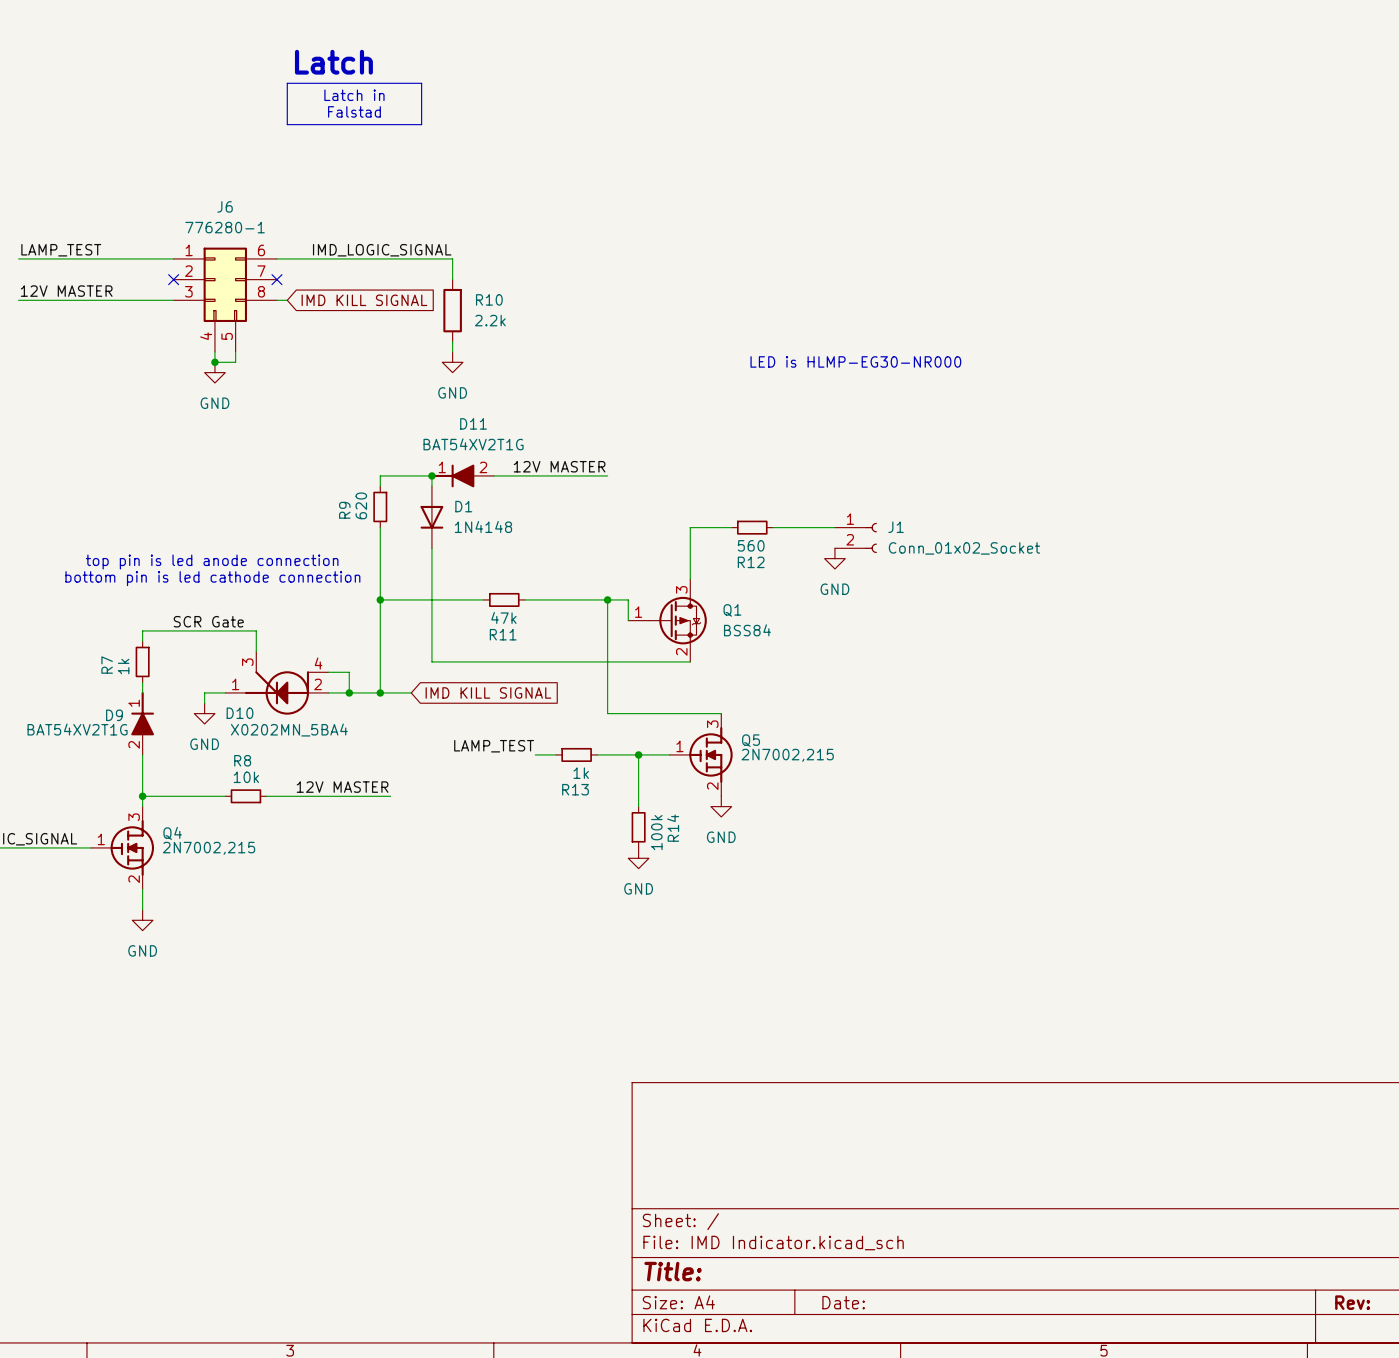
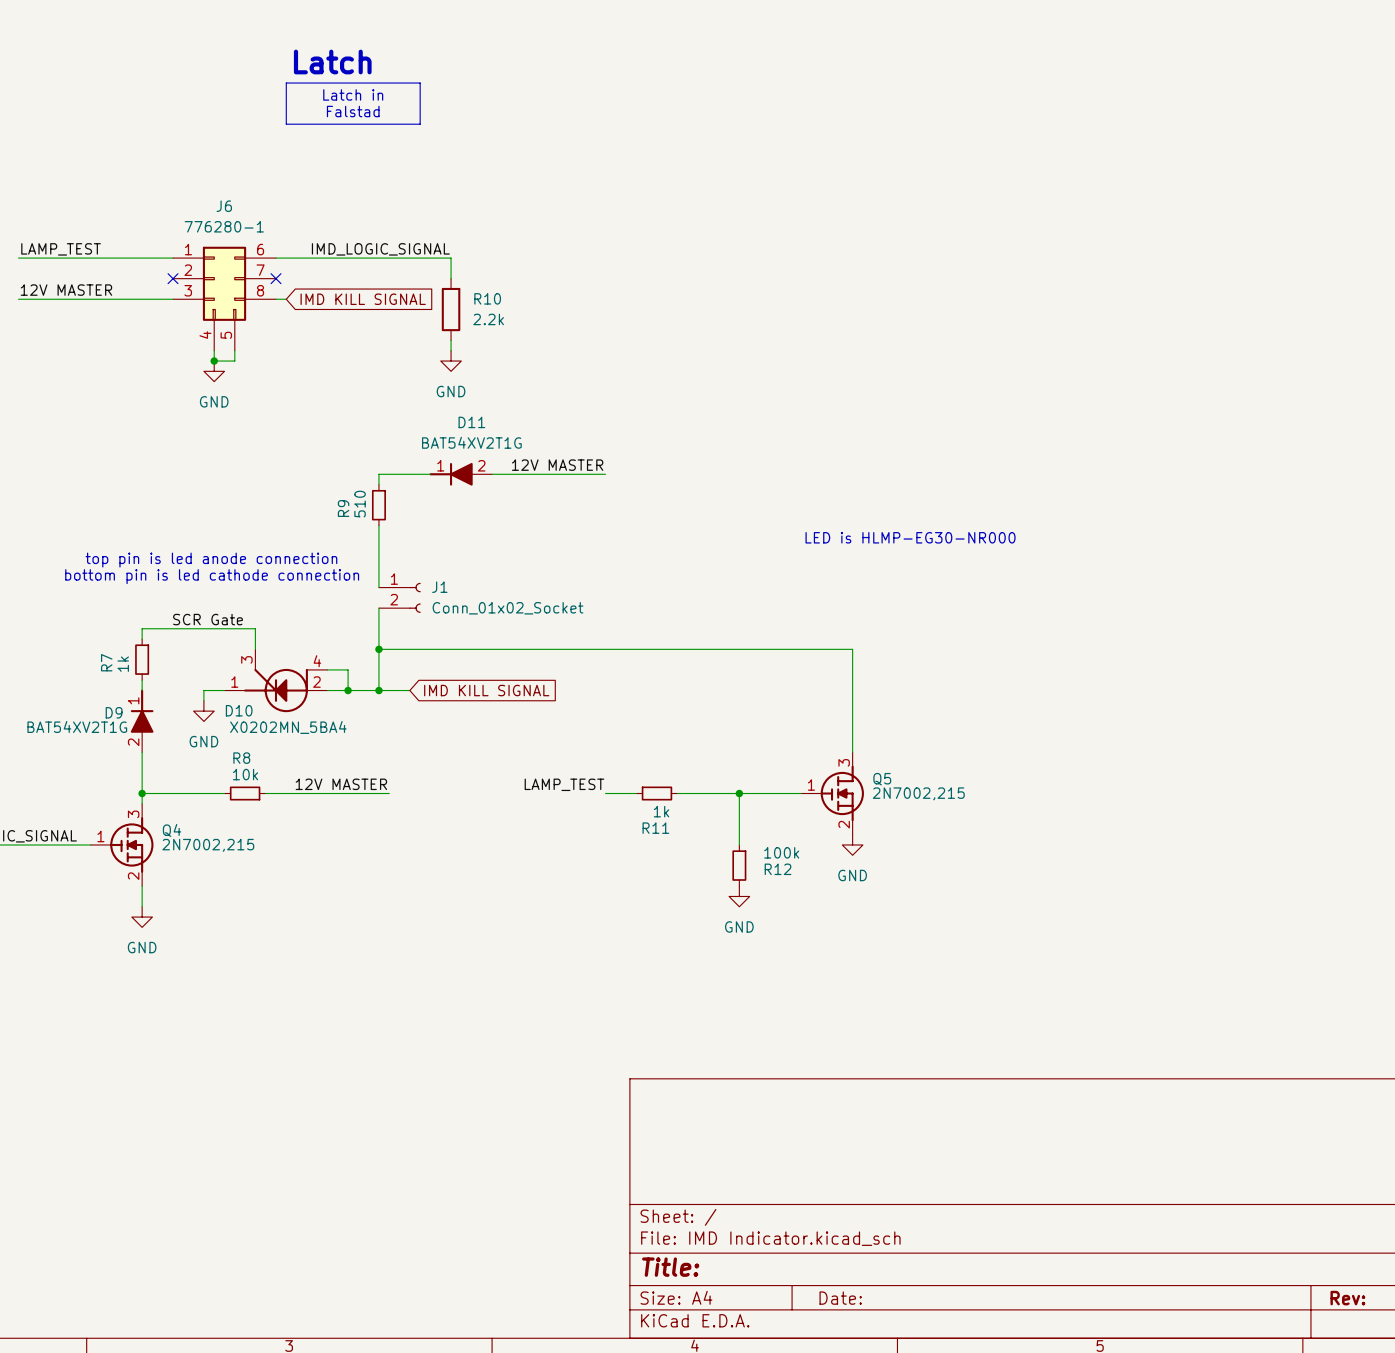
text position: LED is HLMP-EG30-NR000 (855, 361) -> LED is HLMP-EG30-NR000 (910, 537)
wire: (431, 475) (431, 486) -> none
junction: (431, 475) -> none
R9 value: 620 (361, 505) -> 510 (360, 504)
D1: 1N4148 (431, 517) -> none
wire: (731, 527) (690, 527) (690, 579) -> none
R12 rotation: 0° (752, 527) -> 90° clockwise (739, 865)
R12 position: (752, 527) -> (739, 865)
wire: (772, 527) (834, 527) -> none
J1 position: (855, 537) -> (399, 597)
R12 value: 560 (751, 545) -> 100k (781, 852)
wire: (431, 548) (431, 661) (690, 661) -> none
power symbol: GND (834, 558) -> none
R12 name position: R12 (751, 562) -> R12 (778, 869)
wire: (380, 589) (380, 610) -> none
wire: (380, 599) (483, 599) -> none
junction: (380, 599) -> none
R11 position: (504, 599) -> (656, 793)
wire: (524, 599) (628, 599) (628, 620) -> none
wire: (607, 599) (607, 713) (721, 713) -> none
junction: (607, 599) -> none
R11 value: 47k (503, 617) -> 1k (661, 811)
Q1: BSS84 (667, 620) -> none
wire: none -> (378, 649) (852, 649) (852, 752)
junction: none -> (378, 649)
label position: LAMP_TEST (494, 746) -> LAMP_TEST (564, 784)
wire: (535, 754) (555, 754) -> none
R13: 1k (576, 754) -> none
wire: (597, 754) (669, 754) -> none
wire: (638, 754) (638, 806) -> (739, 793) (739, 844)
junction: (638, 754) -> none
Q5 position: (701, 754) -> (832, 793)
wire: none -> (605, 793) (636, 793)
wire: none -> (677, 793) (801, 793)
junction: none -> (739, 793)
power symbol: GND (721, 806) -> none
R14: 100k (638, 827) -> none
power symbol: none -> GND (852, 844)
power symbol: GND (638, 858) -> none
power symbol: none -> GND (739, 896)

